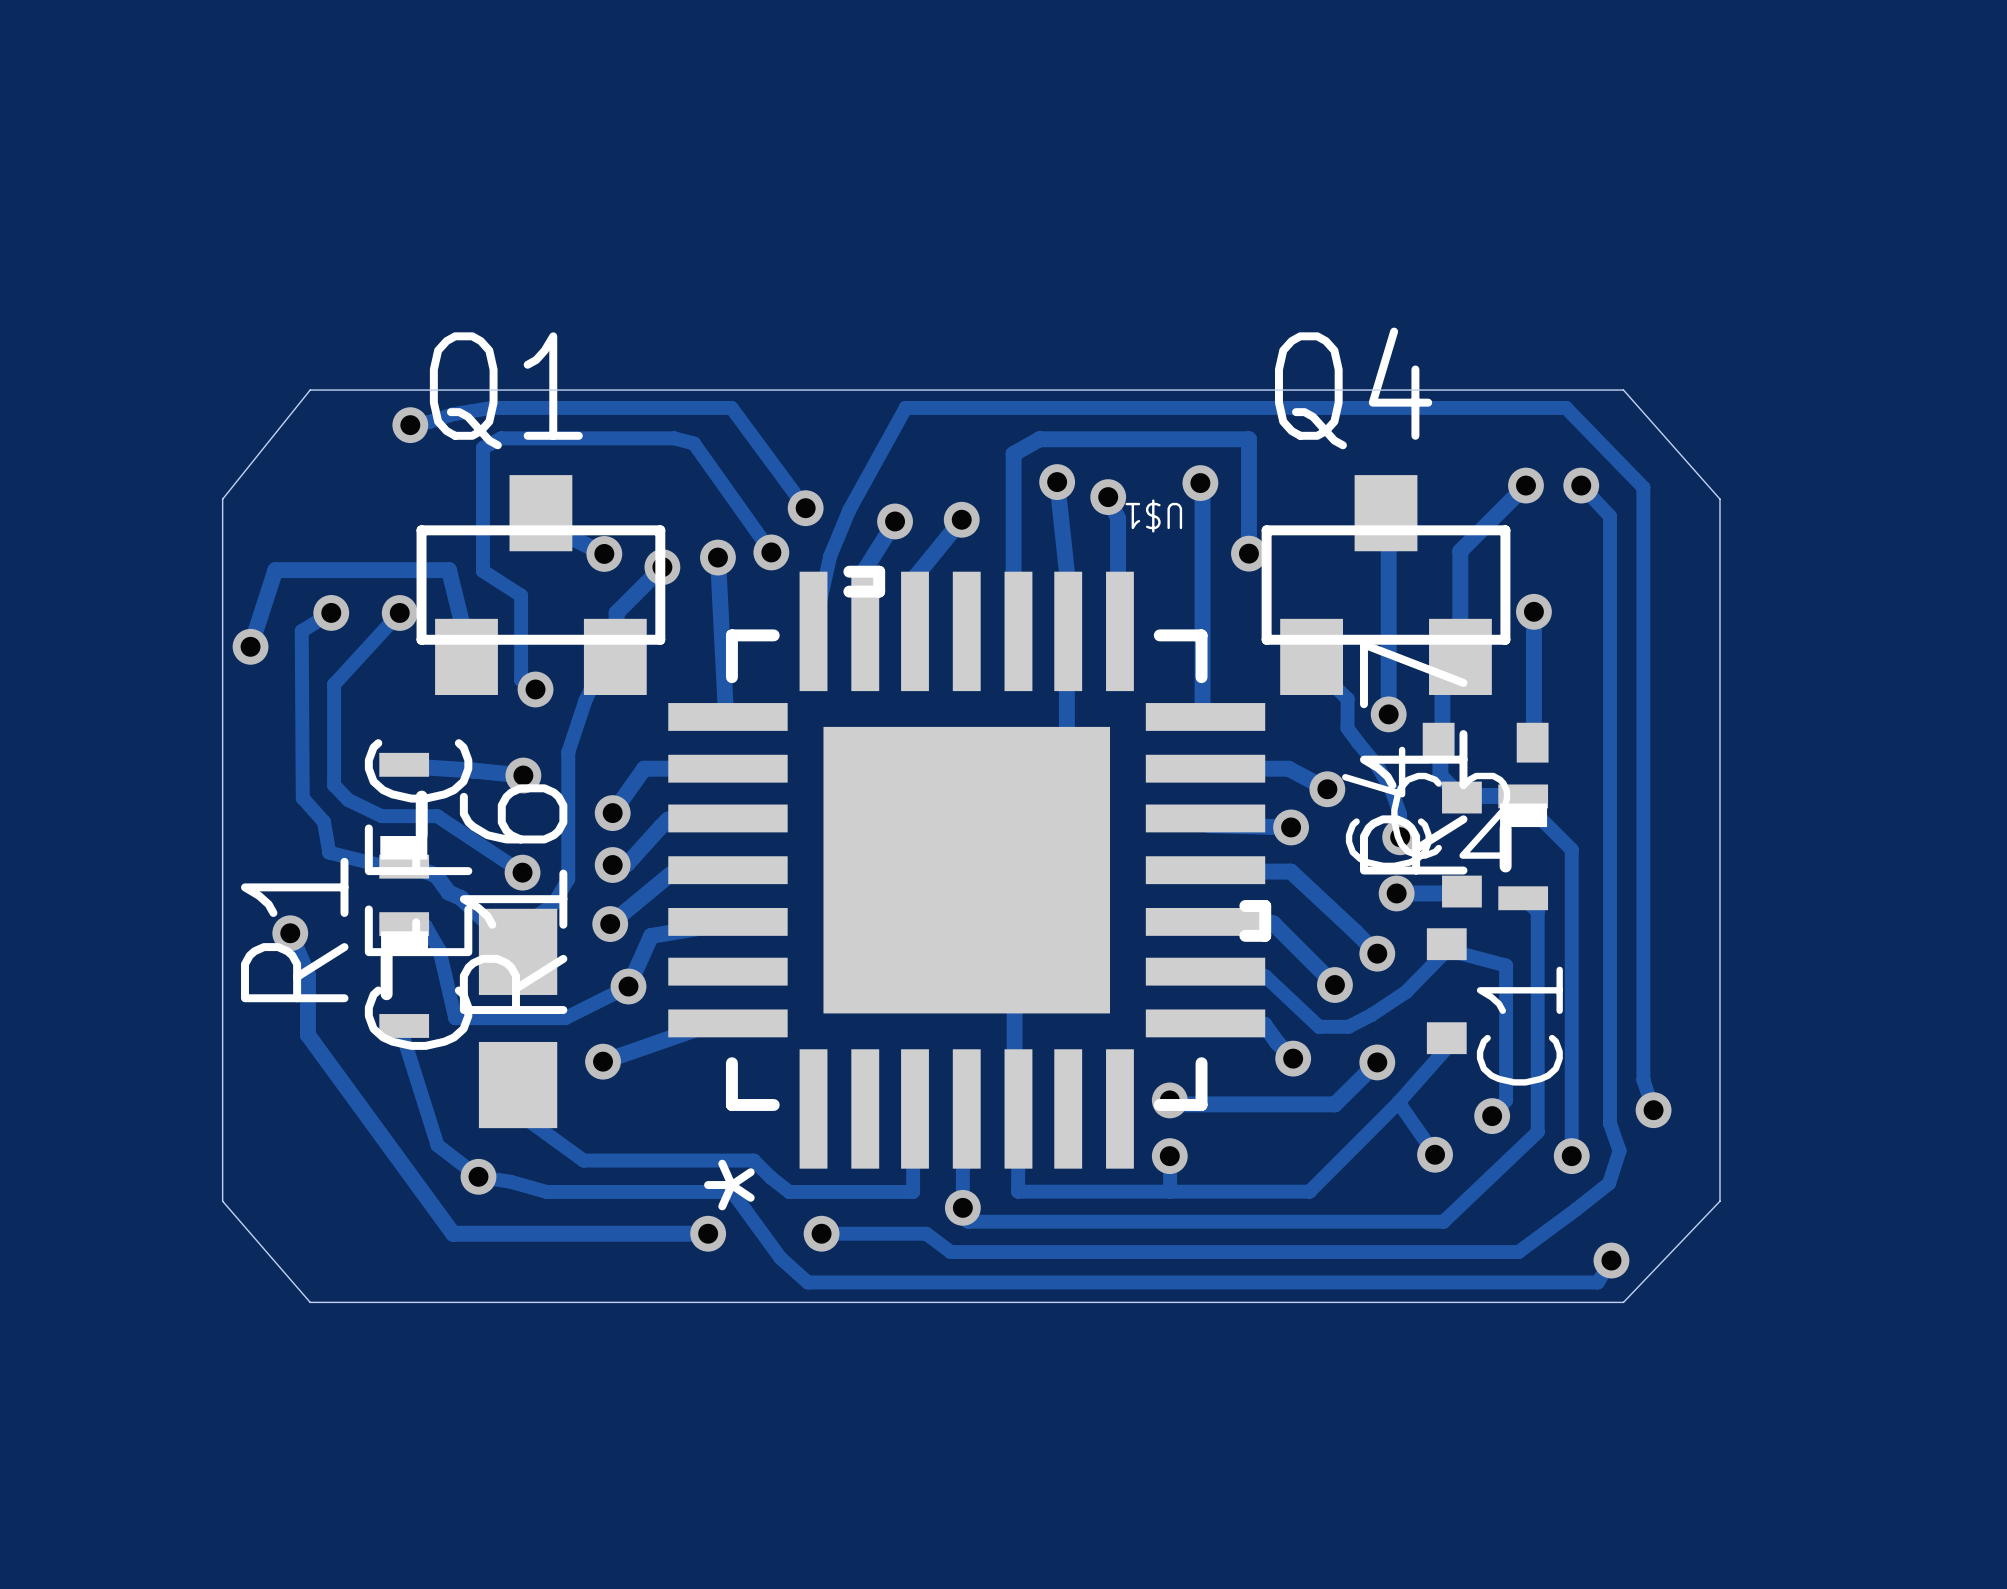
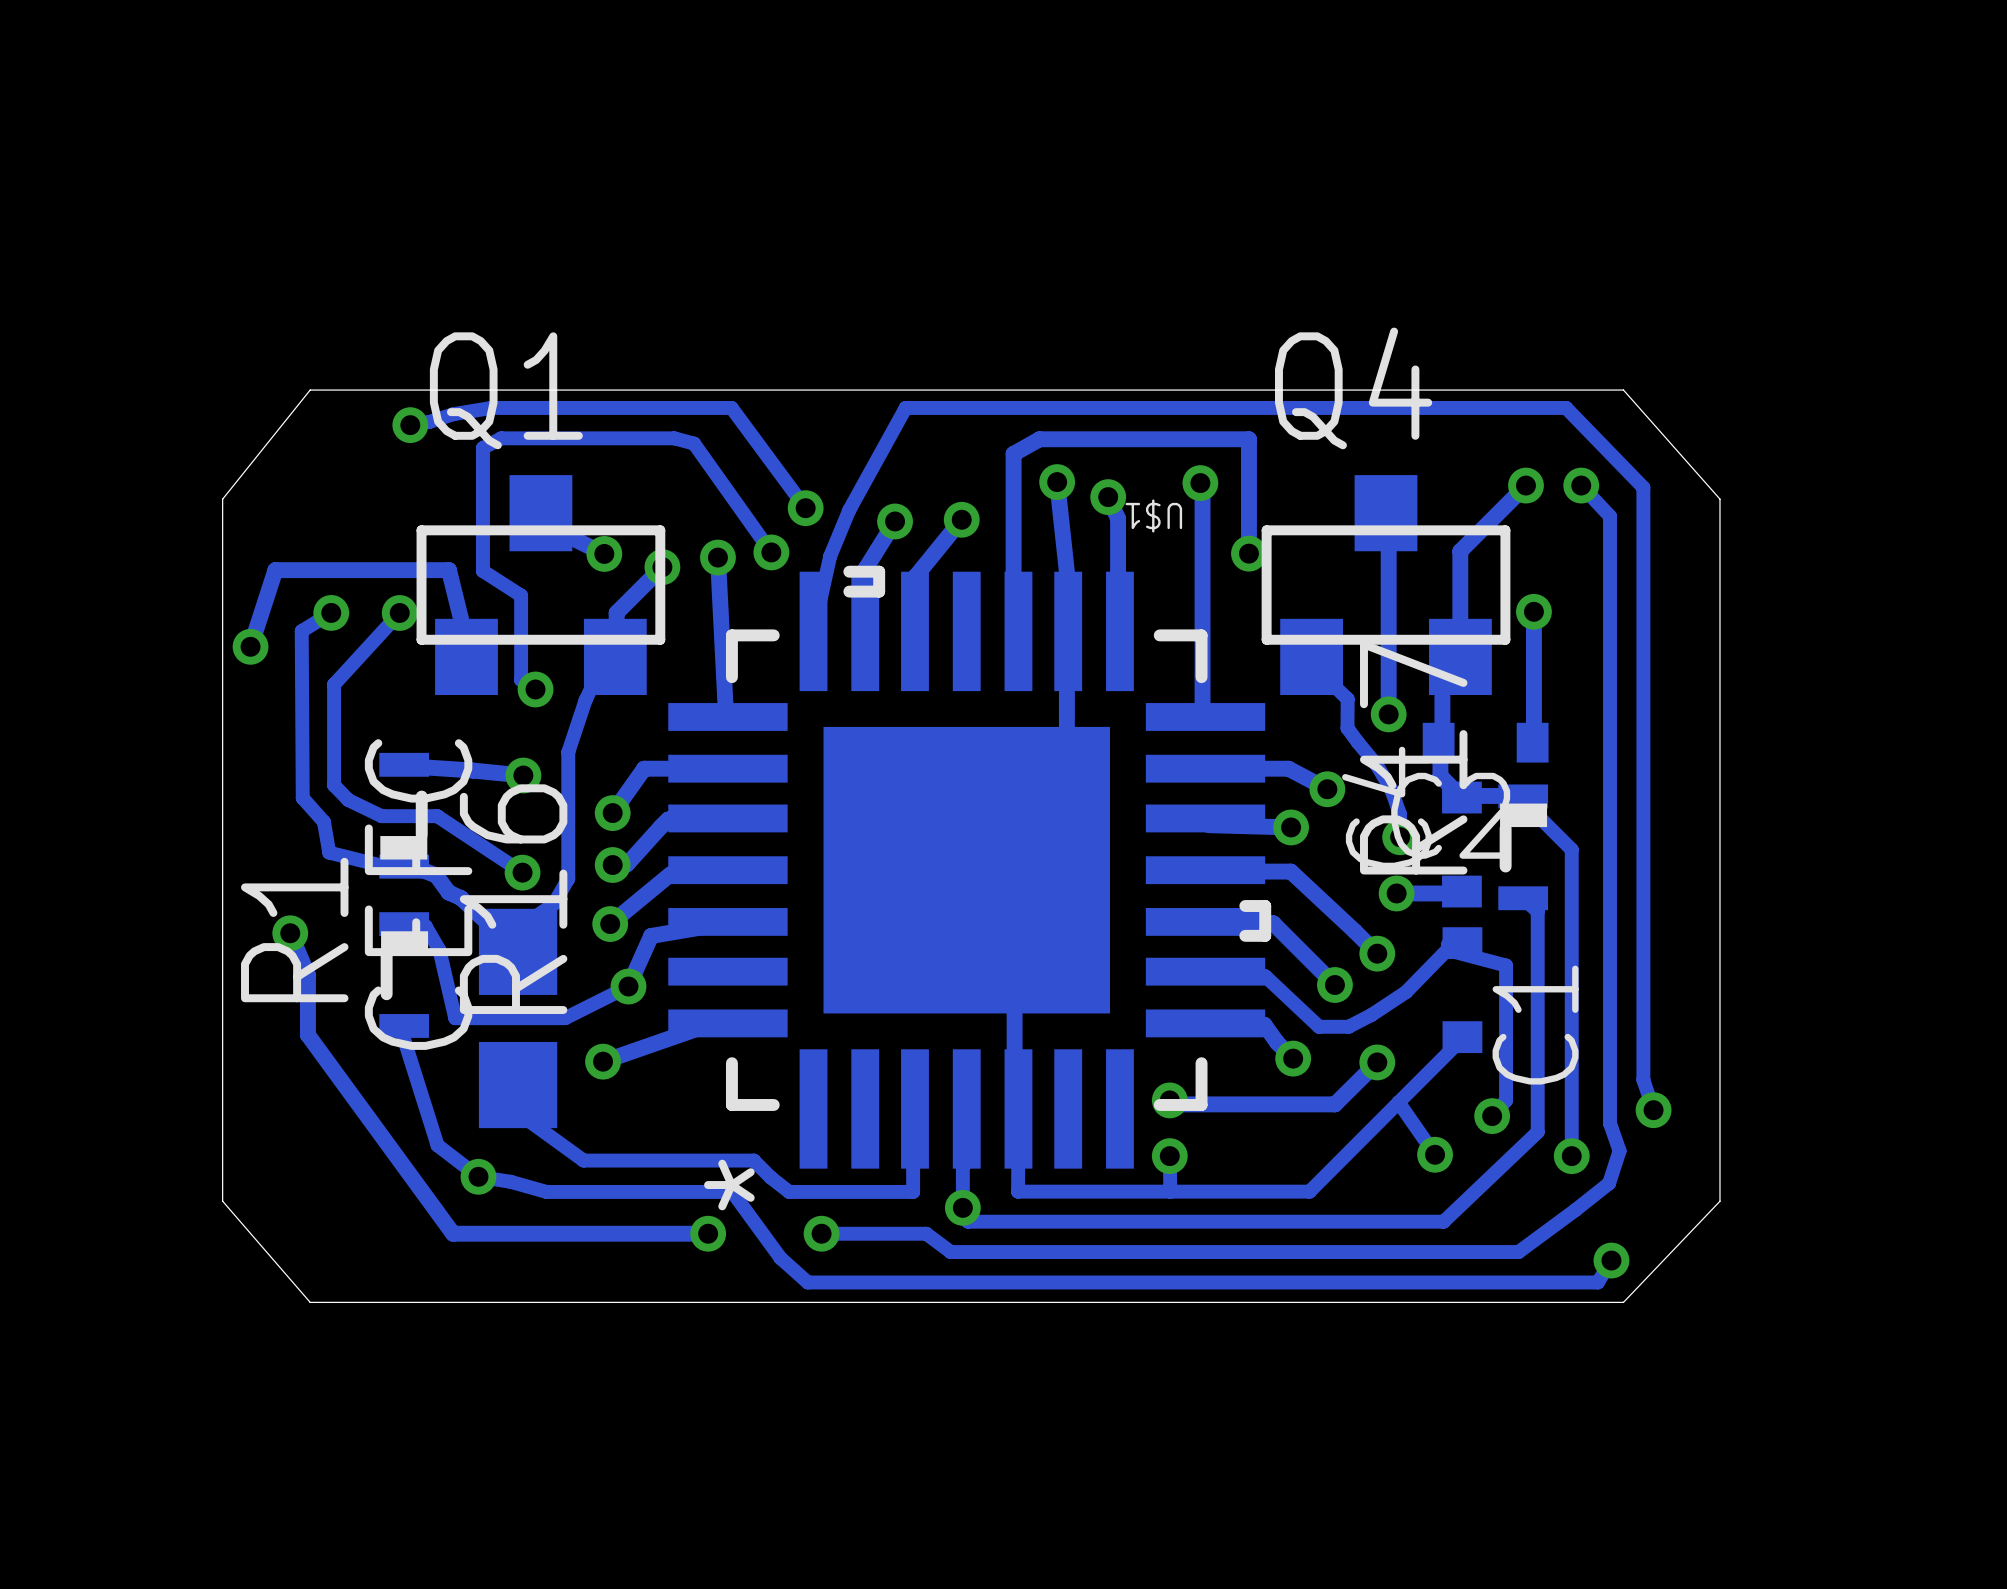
C1 position: (1446, 991) -> (1462, 990)
track: (1446, 1038) (1450, 1043) (1398, 1102) -> (1462, 1037) (1398, 1102)

